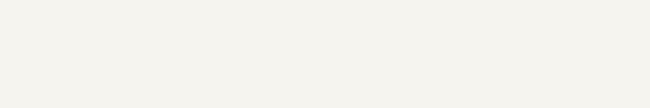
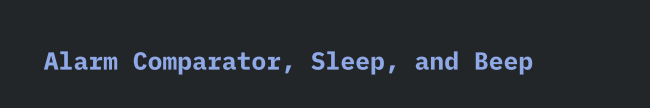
text: none -> Alarm Comparator, Sleep, and Beep (288, 62)

